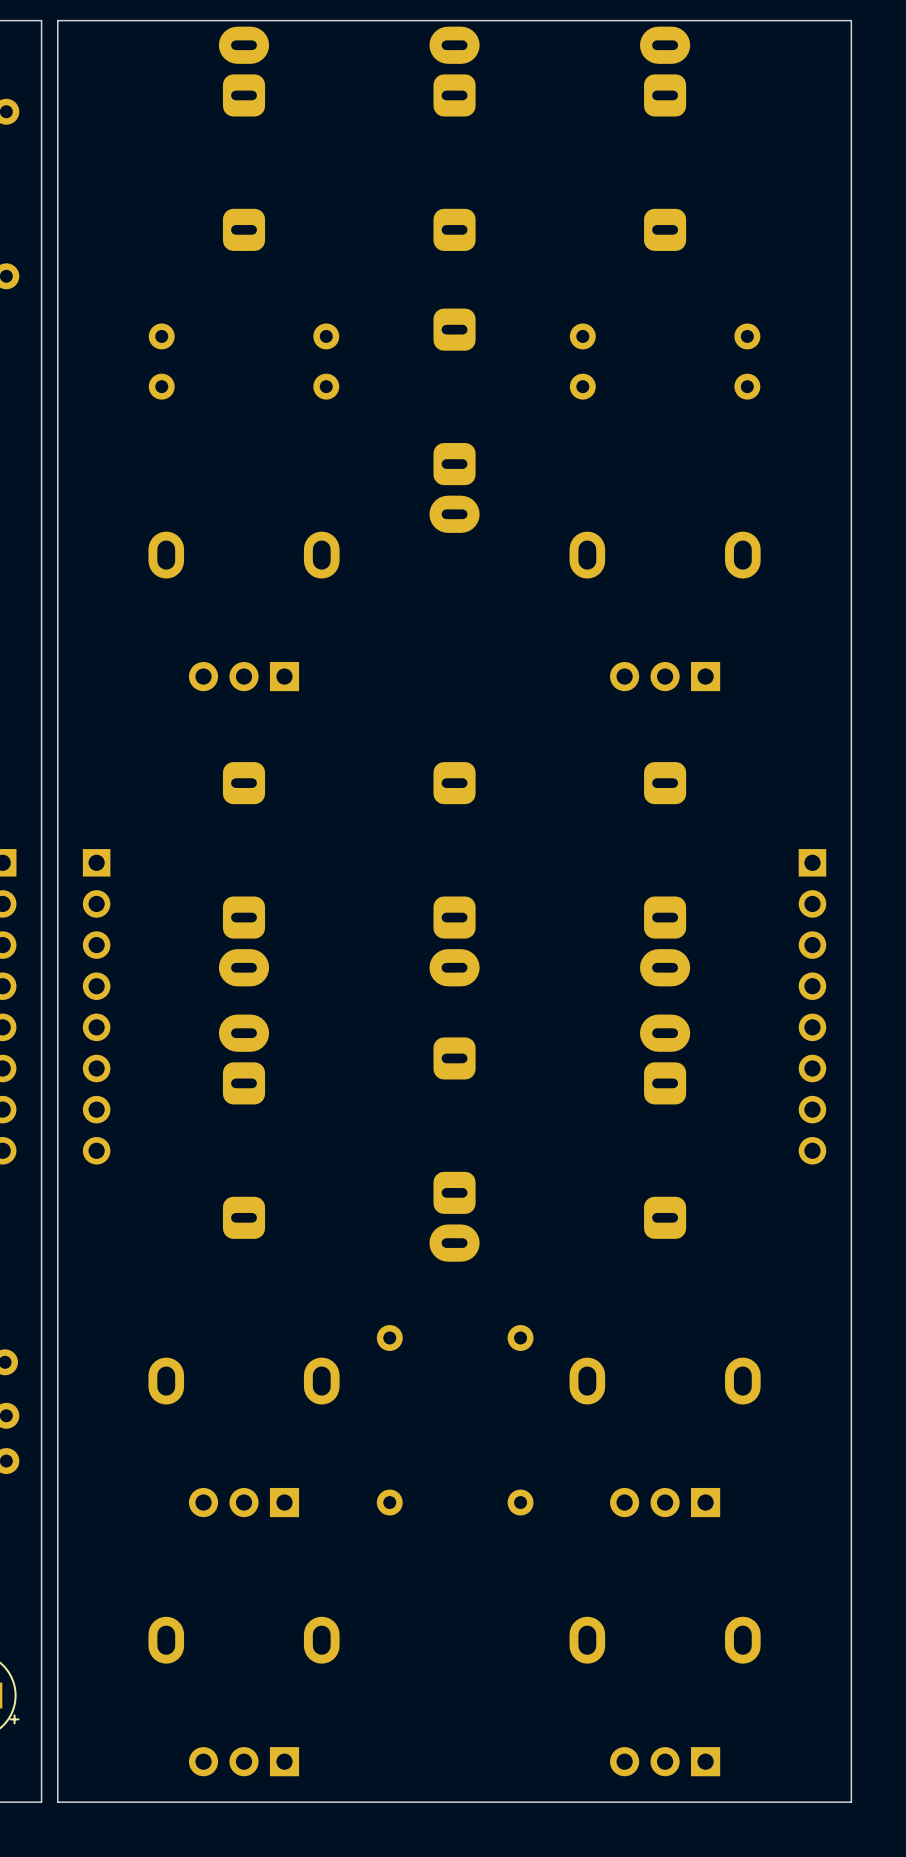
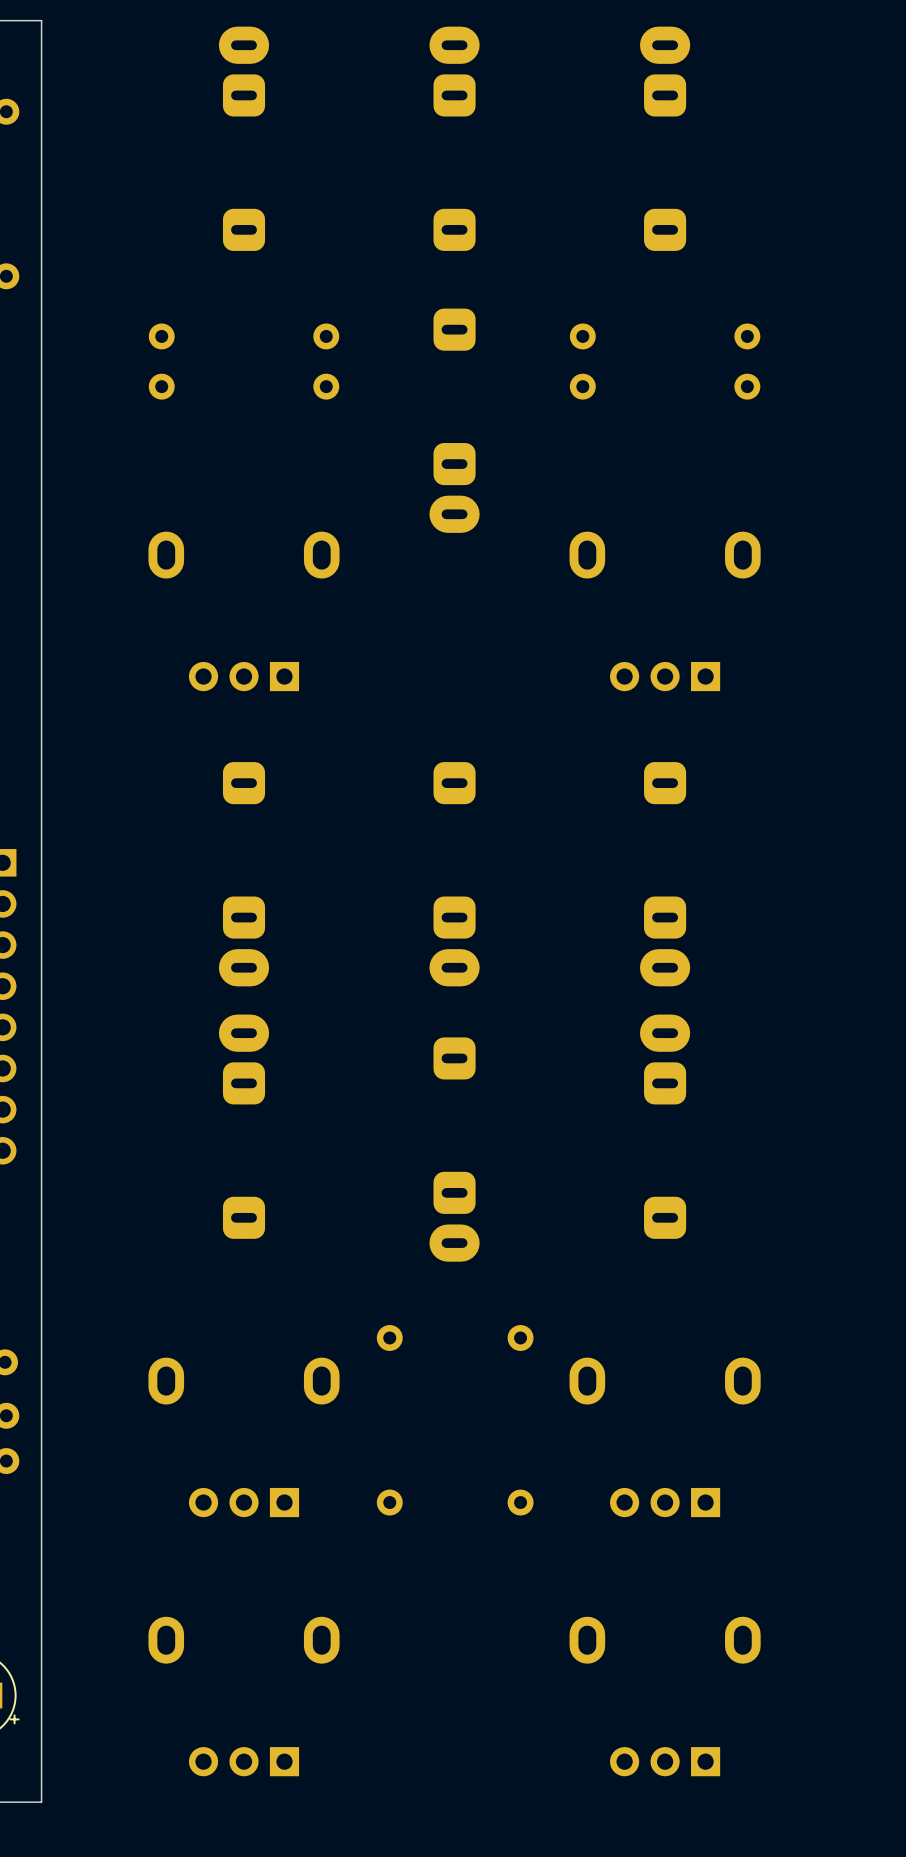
board edge: (851, 20) (57, 20) (57, 1802) (851, 1802) (851, 20) -> none
part: (96, 1006) -> none
part: (812, 1006) -> none

